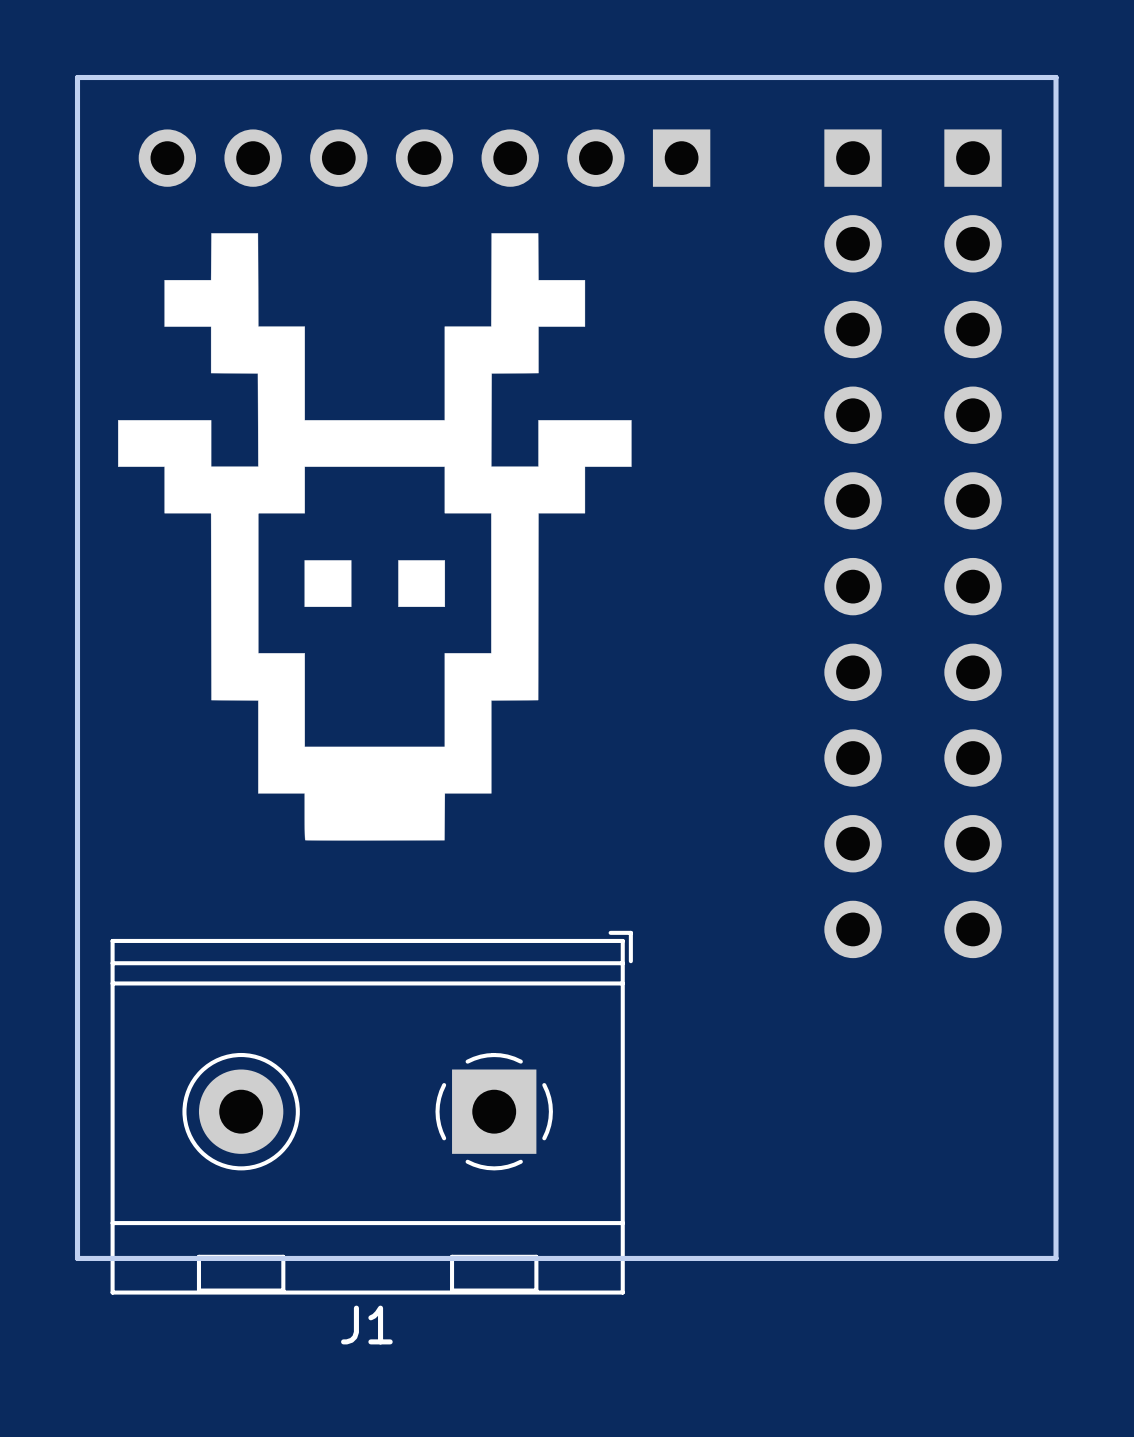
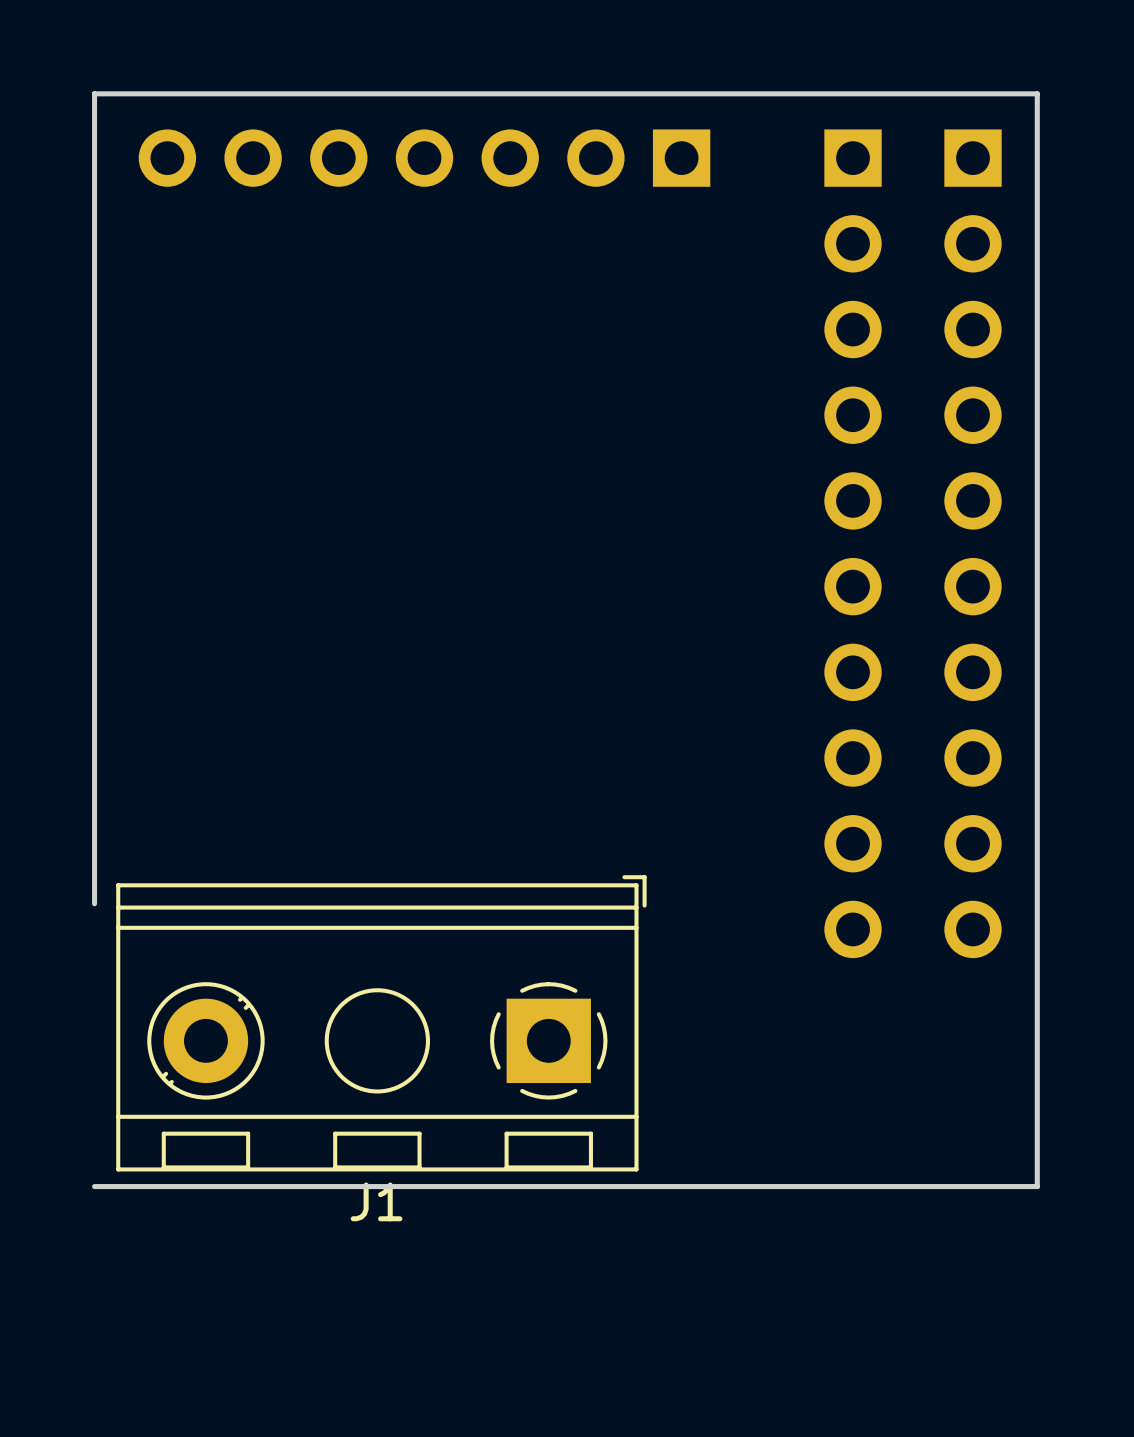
board edge: (1056, 77) (77, 77) (77, 1258) (1056, 1258) (1056, 77) -> none
drawing: [118, 233, 632, 841] -> none
board edge: none -> (94, 903) (94, 93) (1037, 93) (1037, 1186) (94, 1186)
J1 footprint: [110, 930, 633, 1295] -> [116, 875, 647, 1172]

